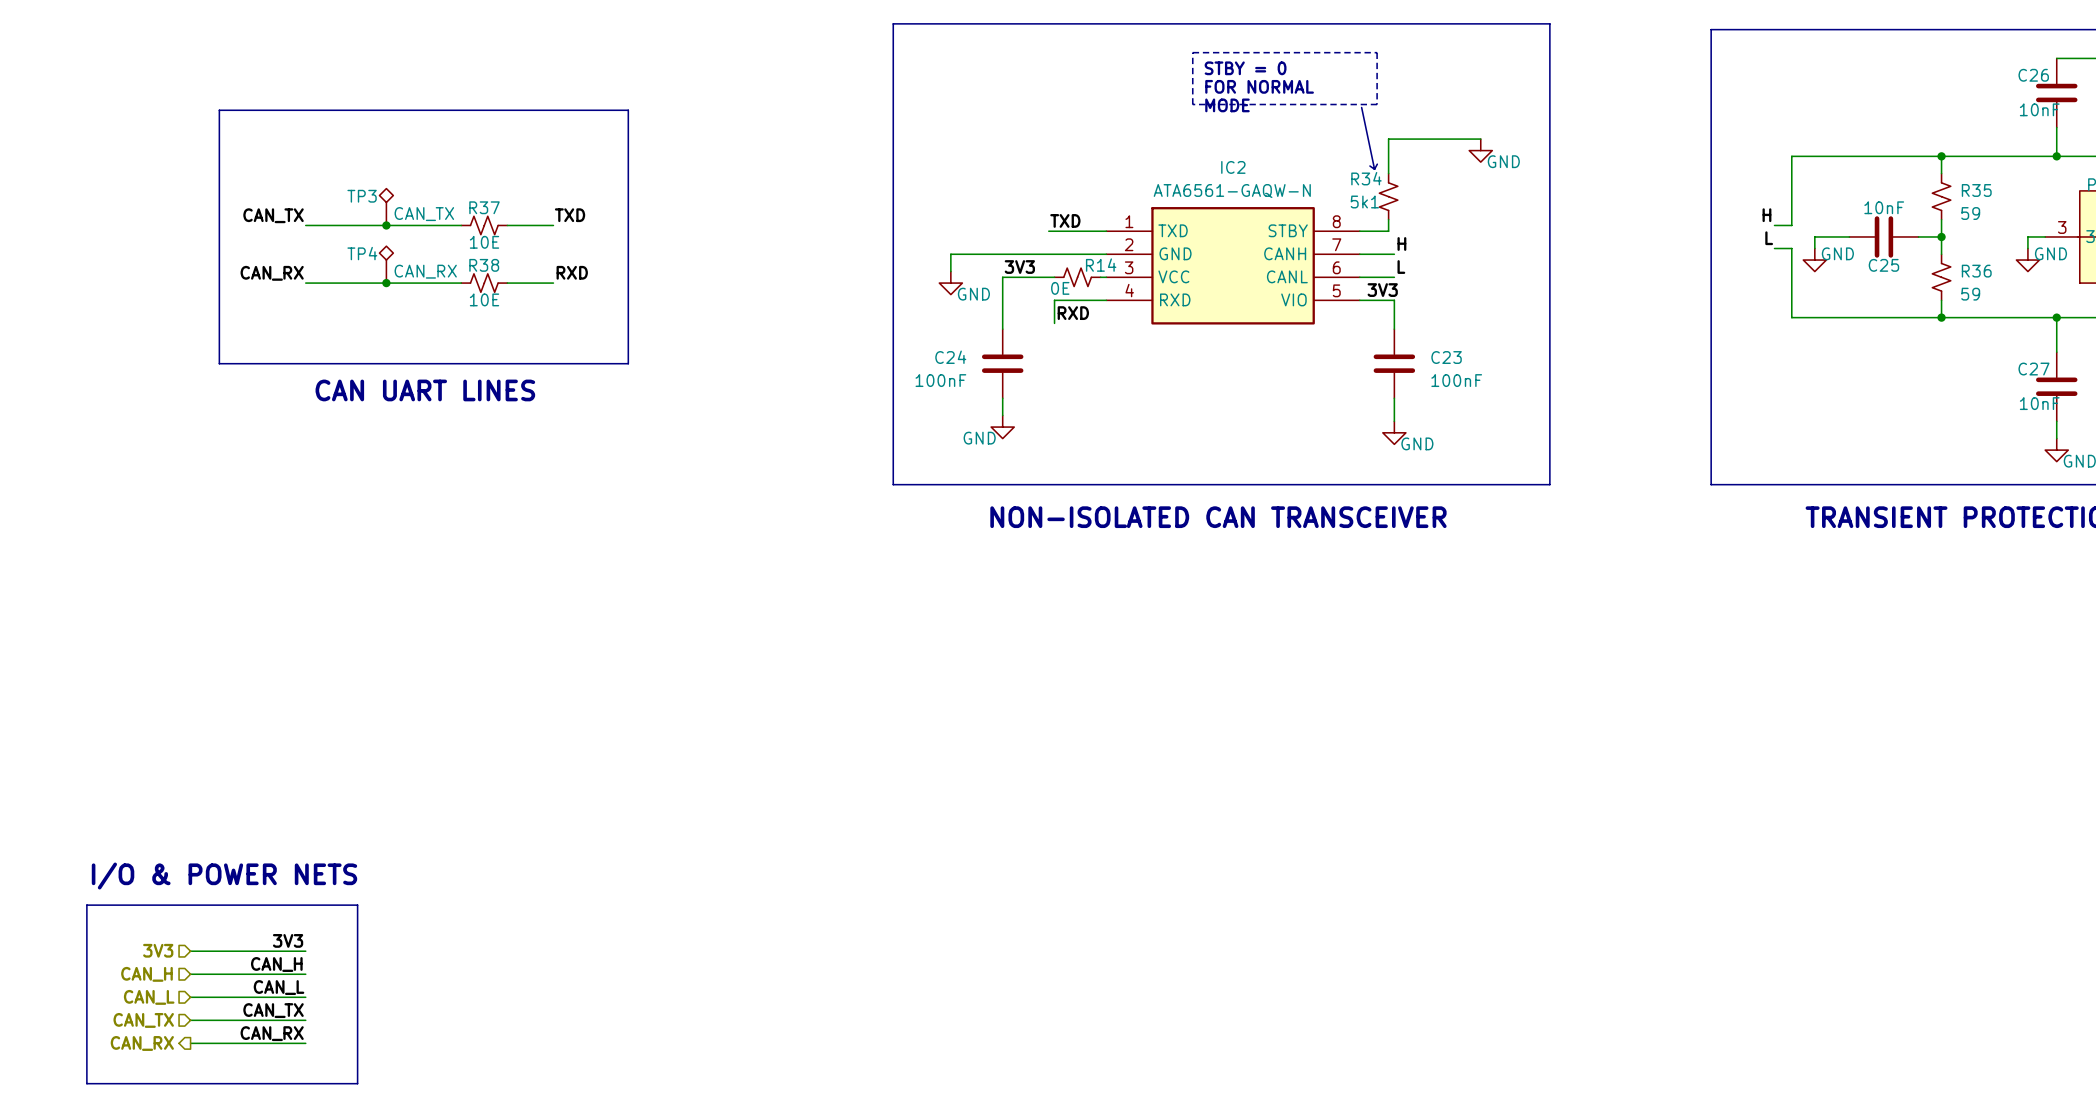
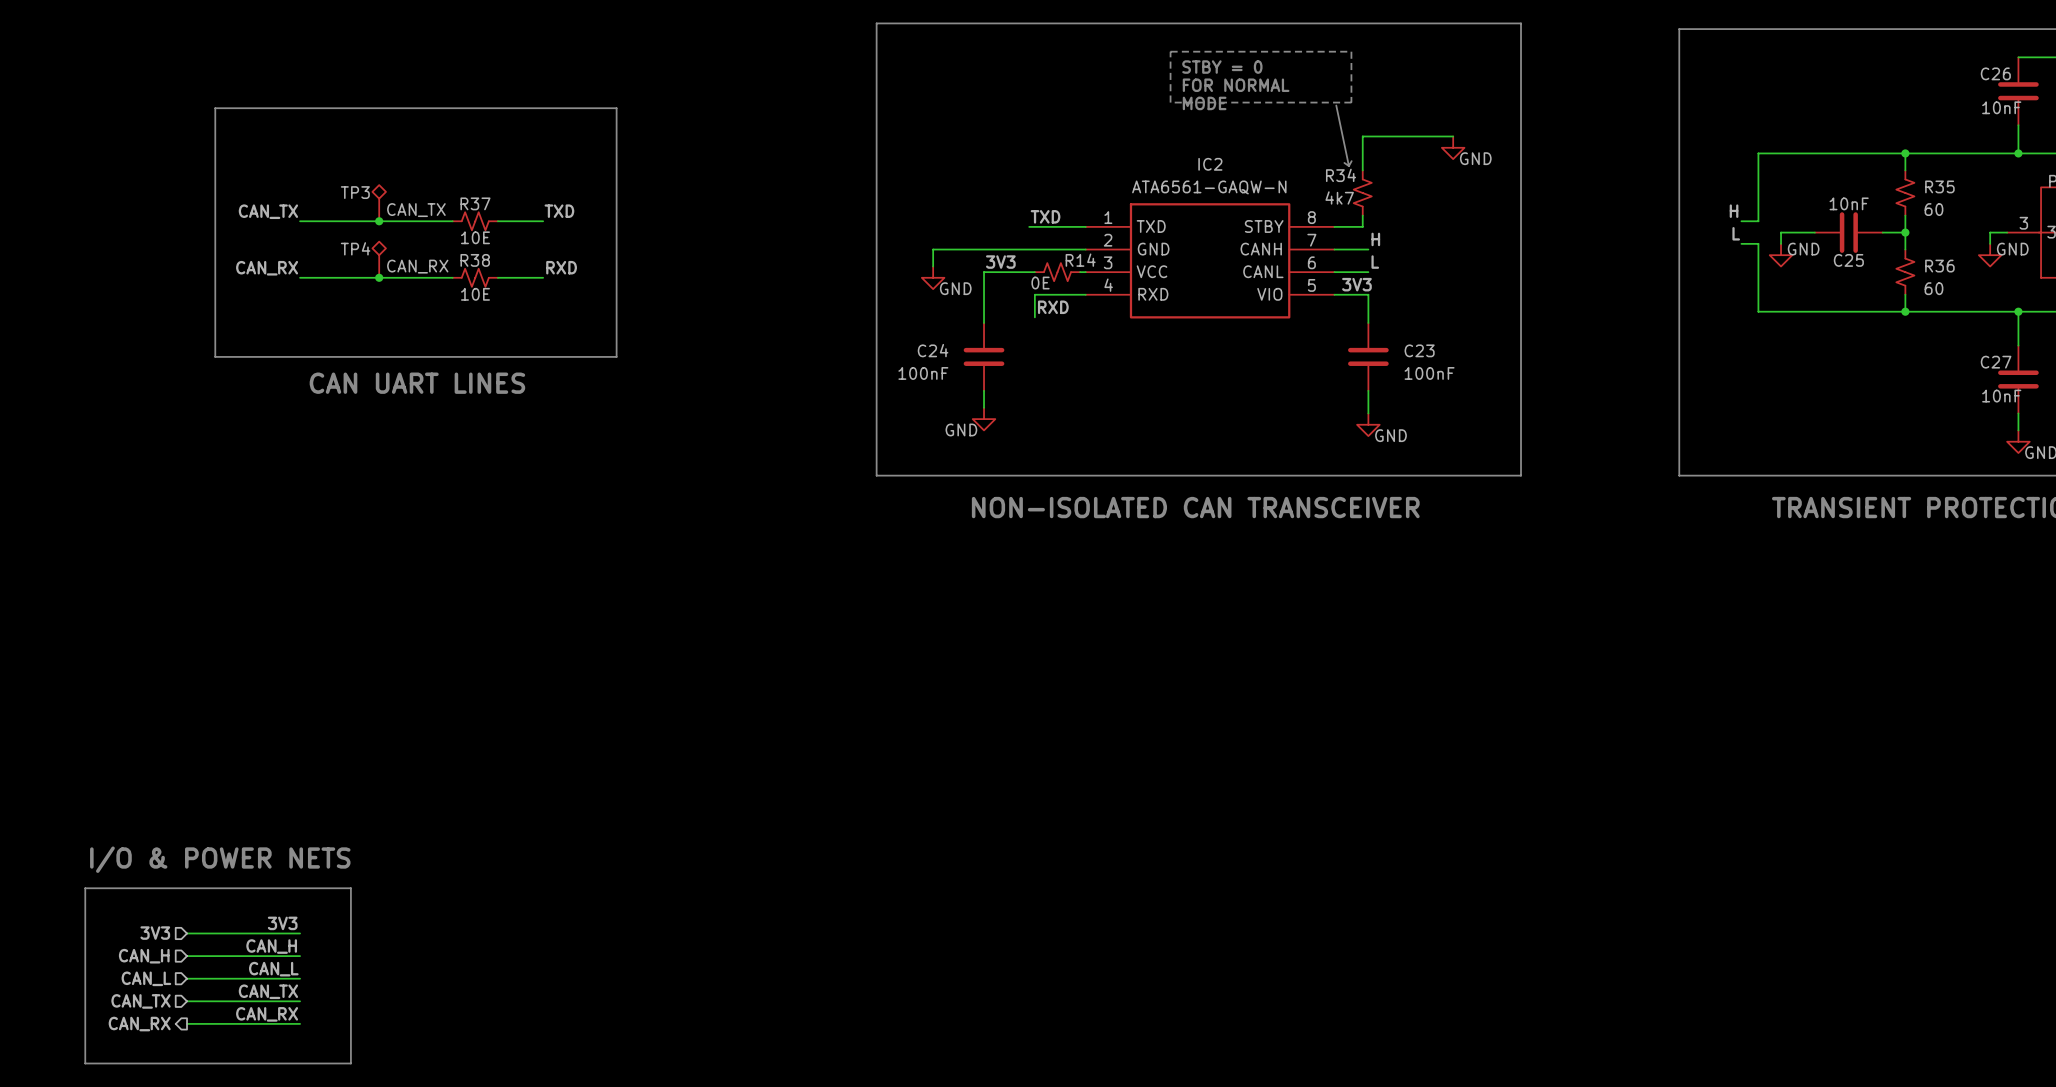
R34 value: 5k1 (1364, 202) -> 4k7 (1339, 197)
R35 value: 59 (1970, 213) -> 60 (1933, 209)
R36 value: 59 (1970, 294) -> 60 (1933, 288)

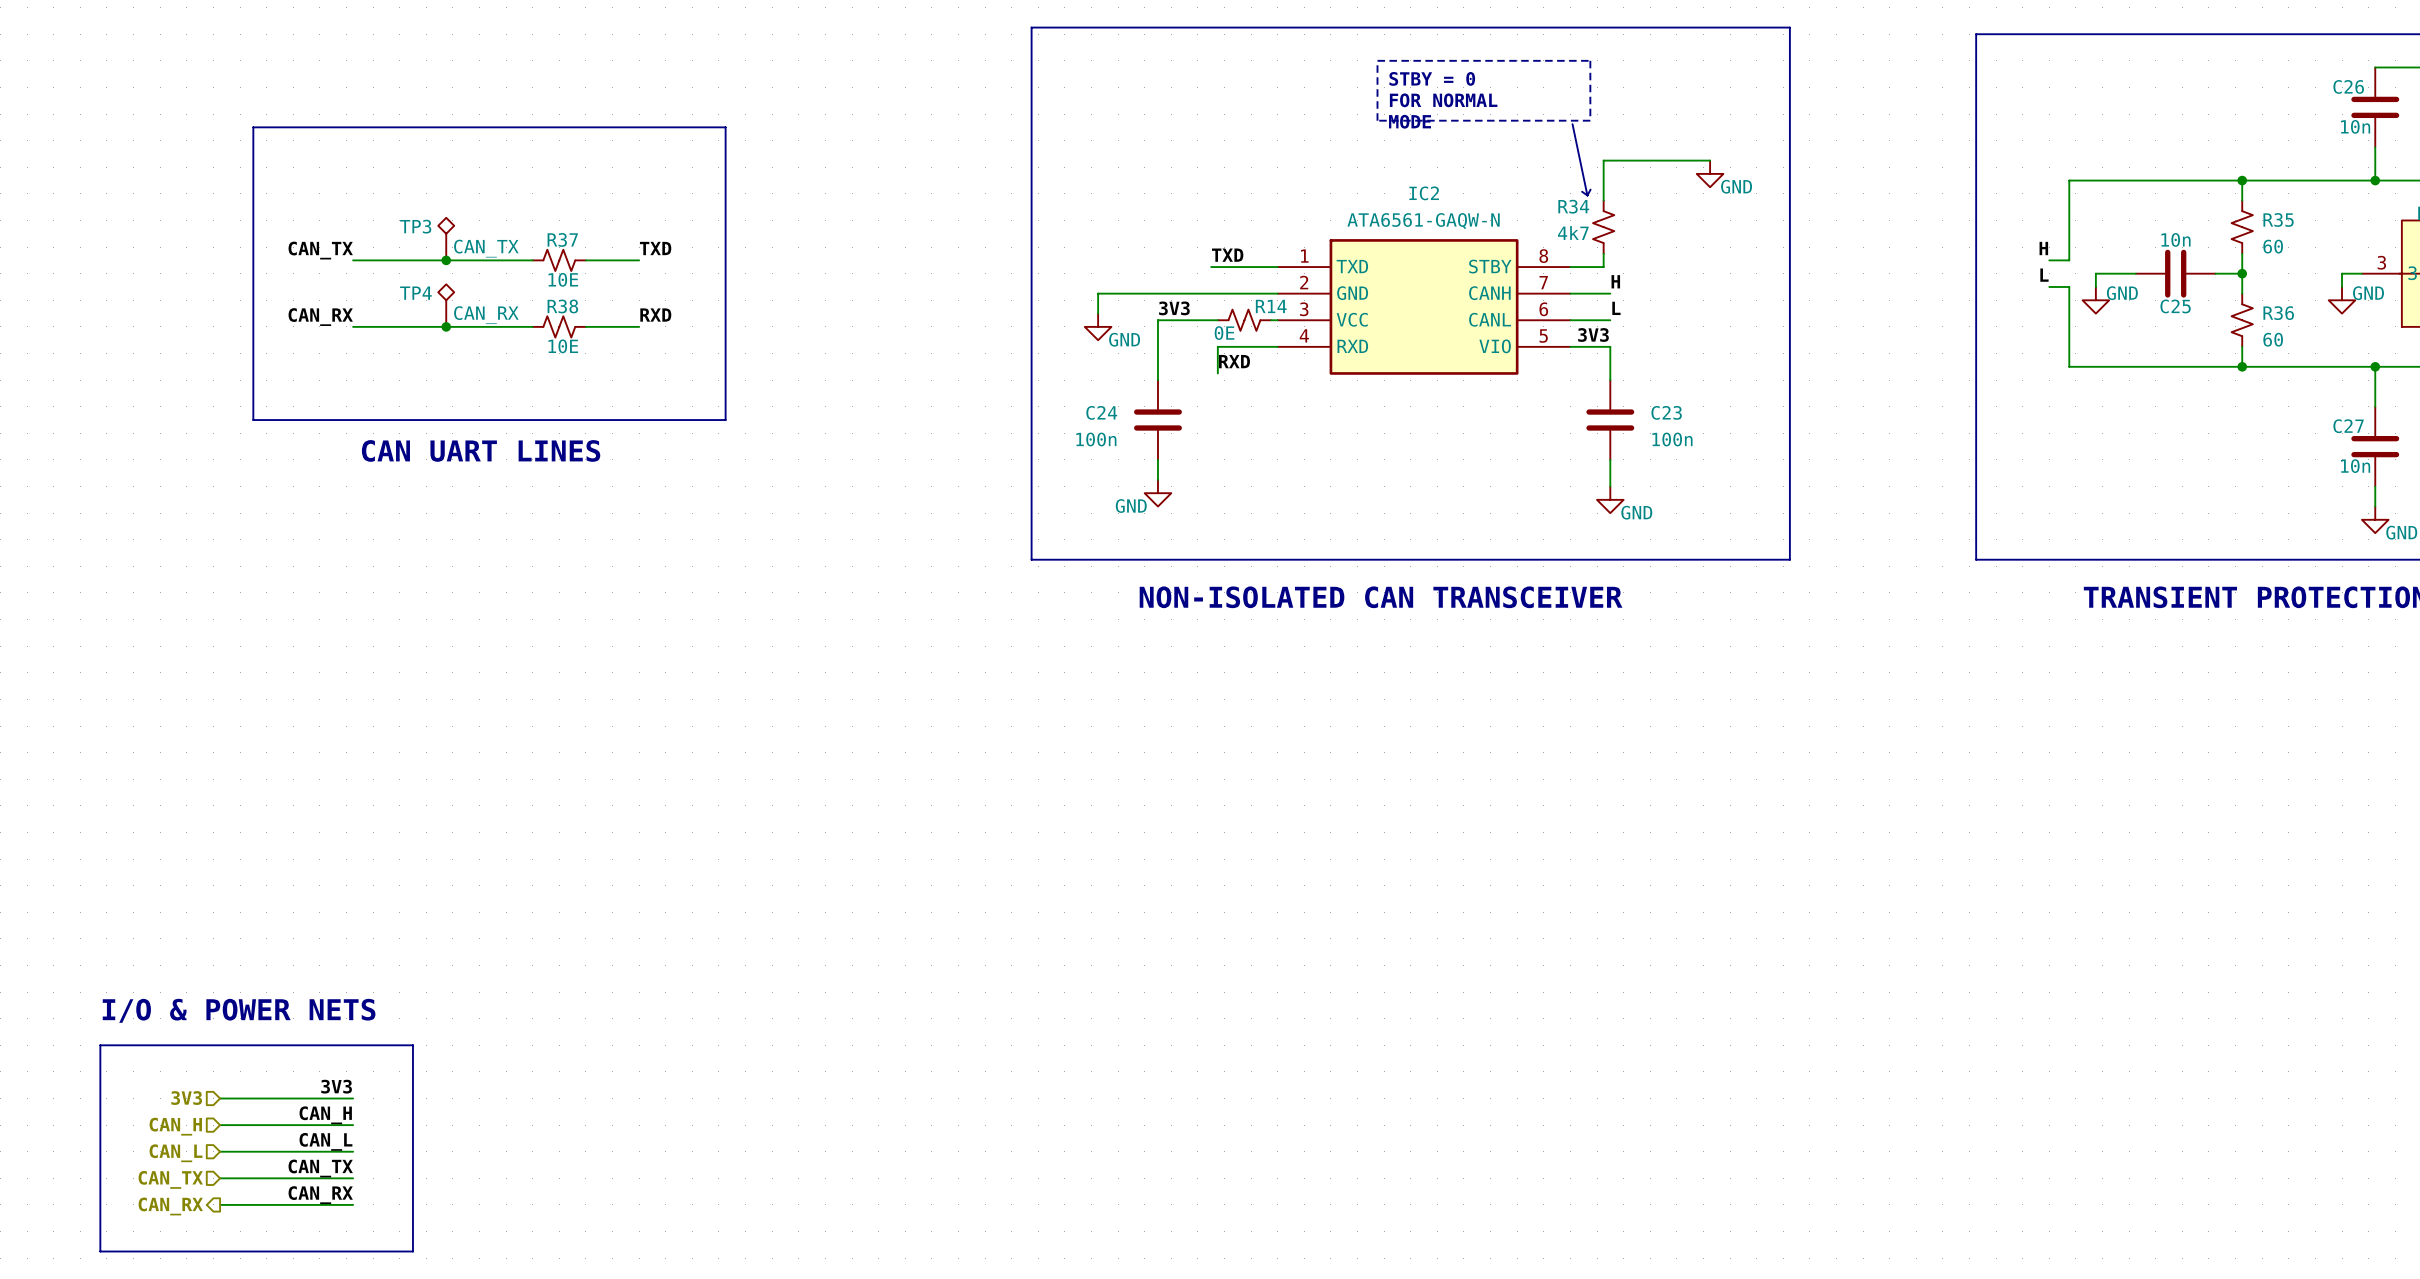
C26 value: 10nF (2001, 107) -> 10n (2355, 126)
C25 value: 10nF (1849, 203) -> 10n (2175, 239)
C24 value: 100nF (923, 373) -> 100n (1096, 439)
C23 value: 100nF (1429, 373) -> 100n (1672, 439)
C27 value: 10nF (2001, 396) -> 10n (2355, 466)

